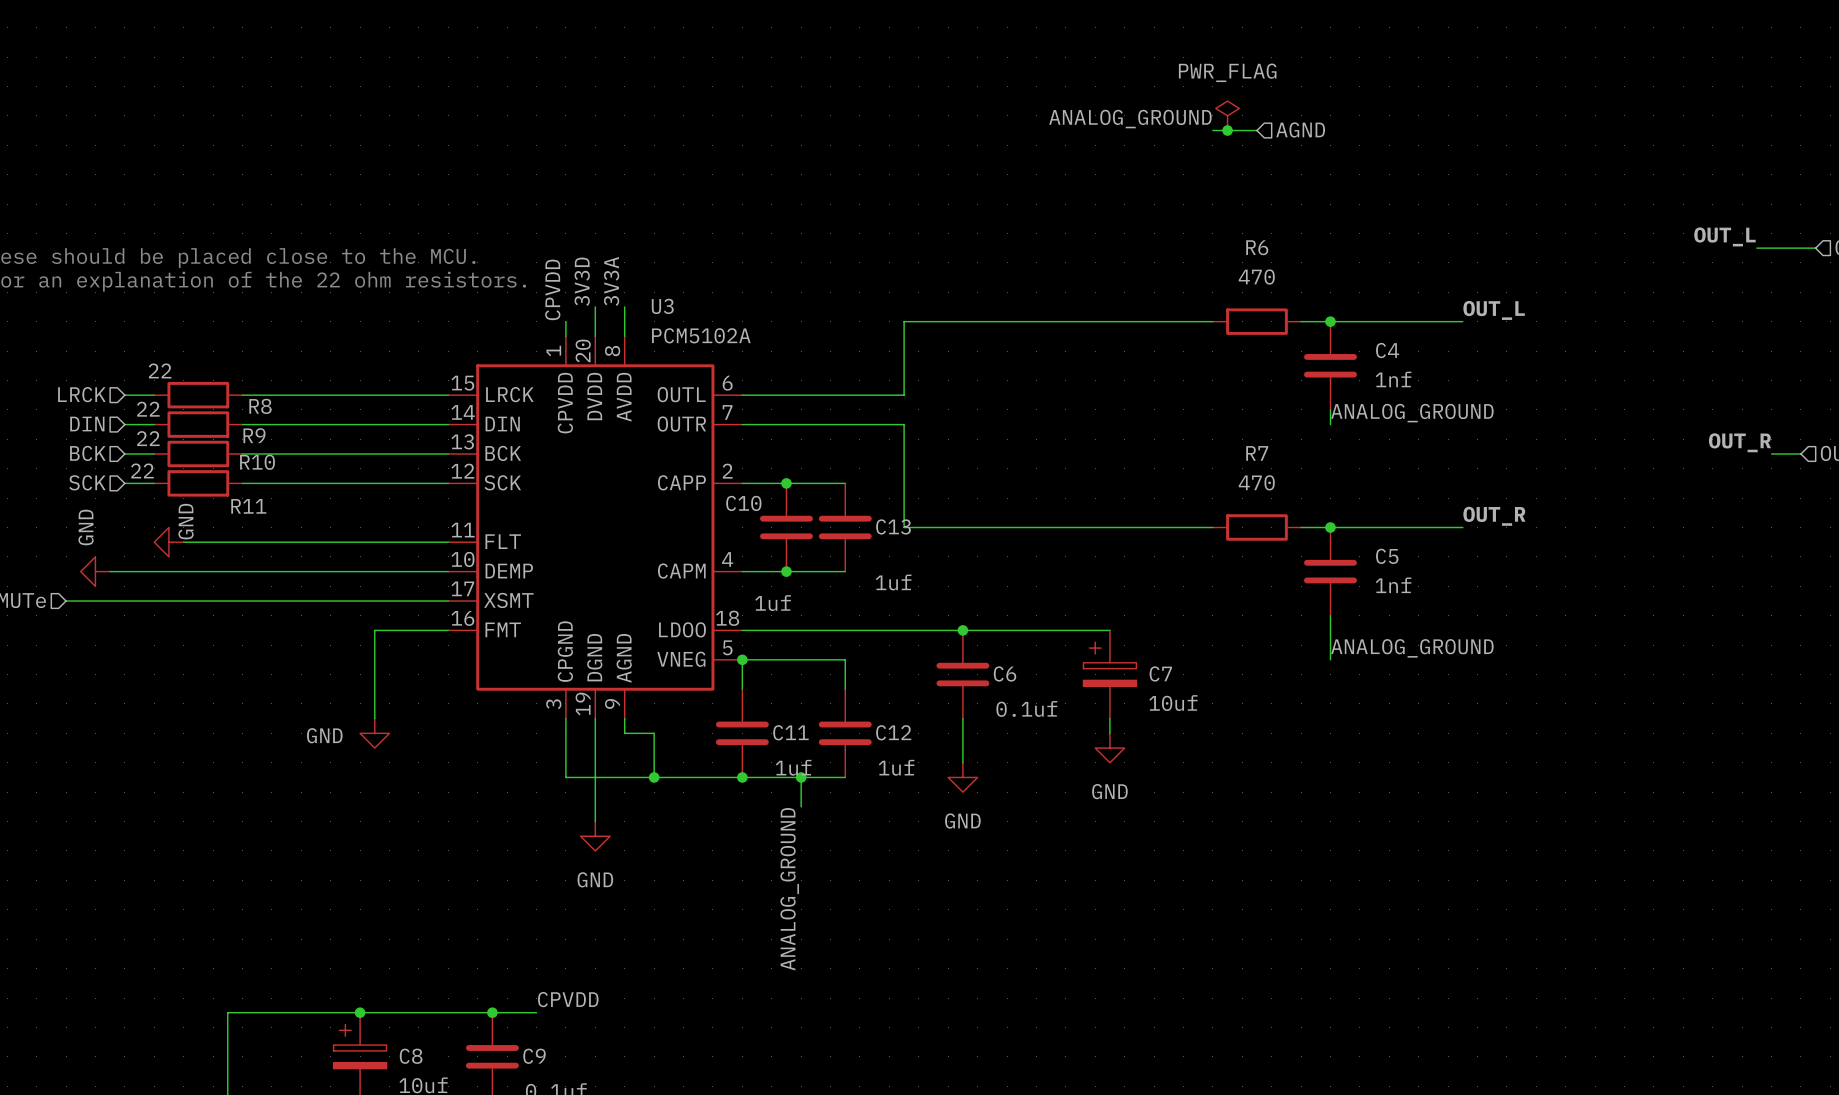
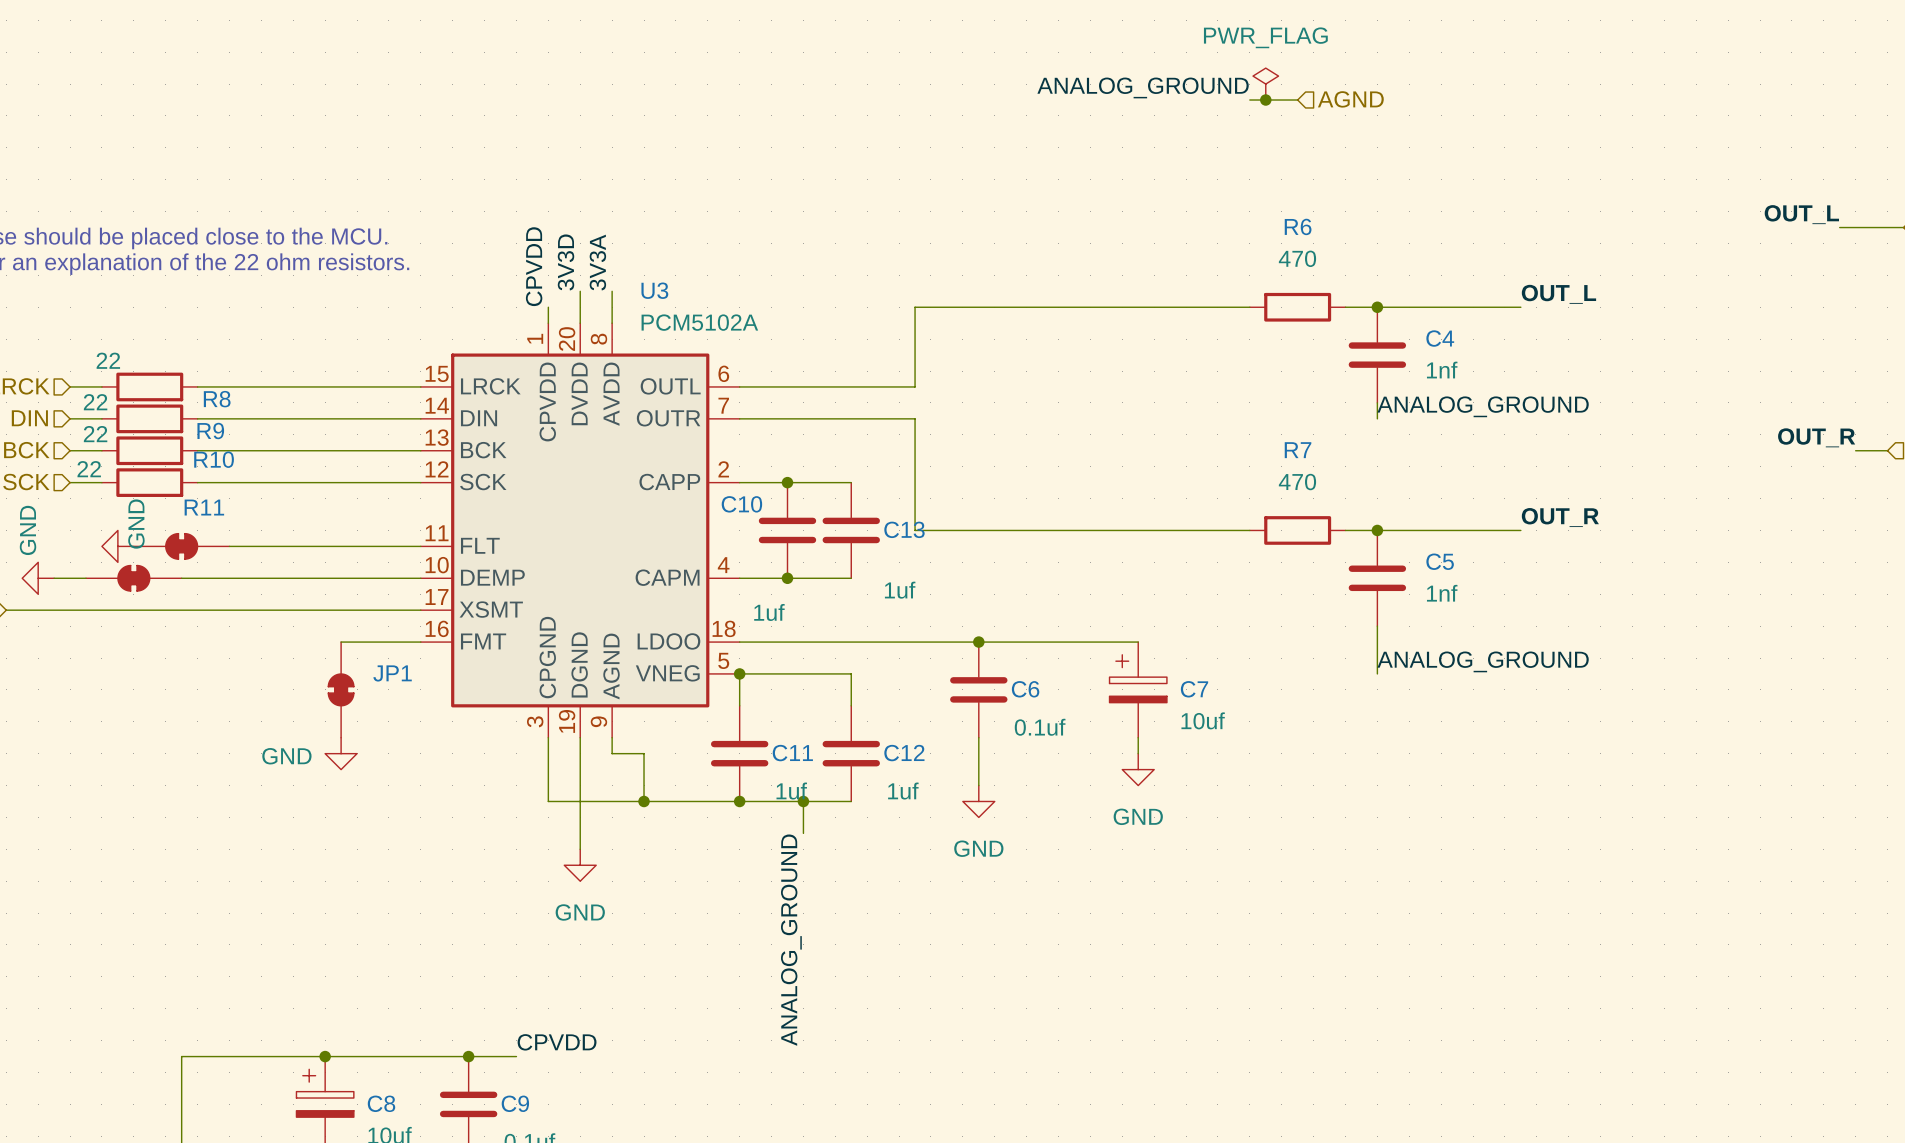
part: none -> (181, 546)
part: none -> (133, 578)
JP1: none -> (341, 689)

